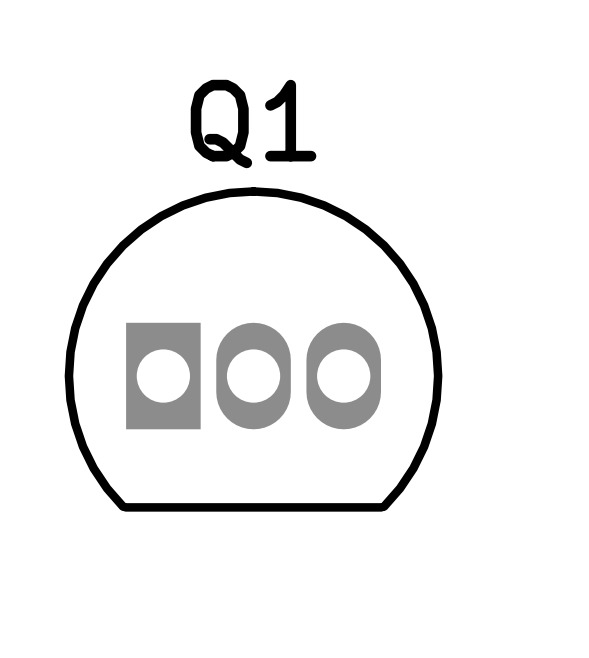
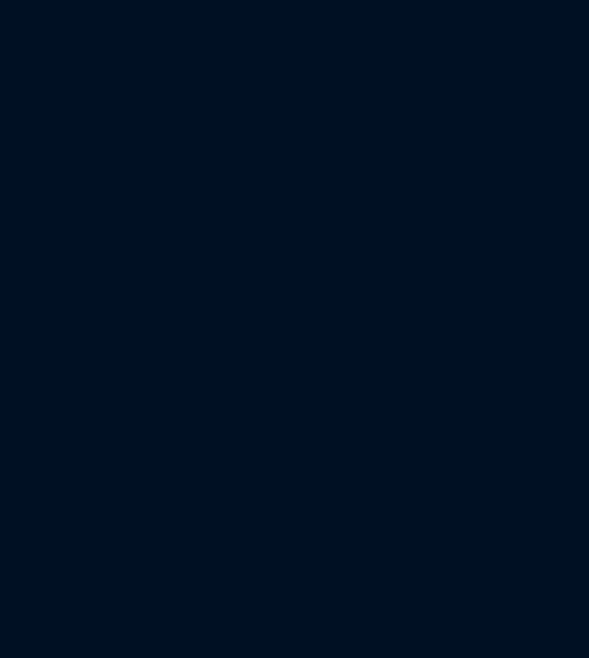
Q1: (253, 349) -> none

